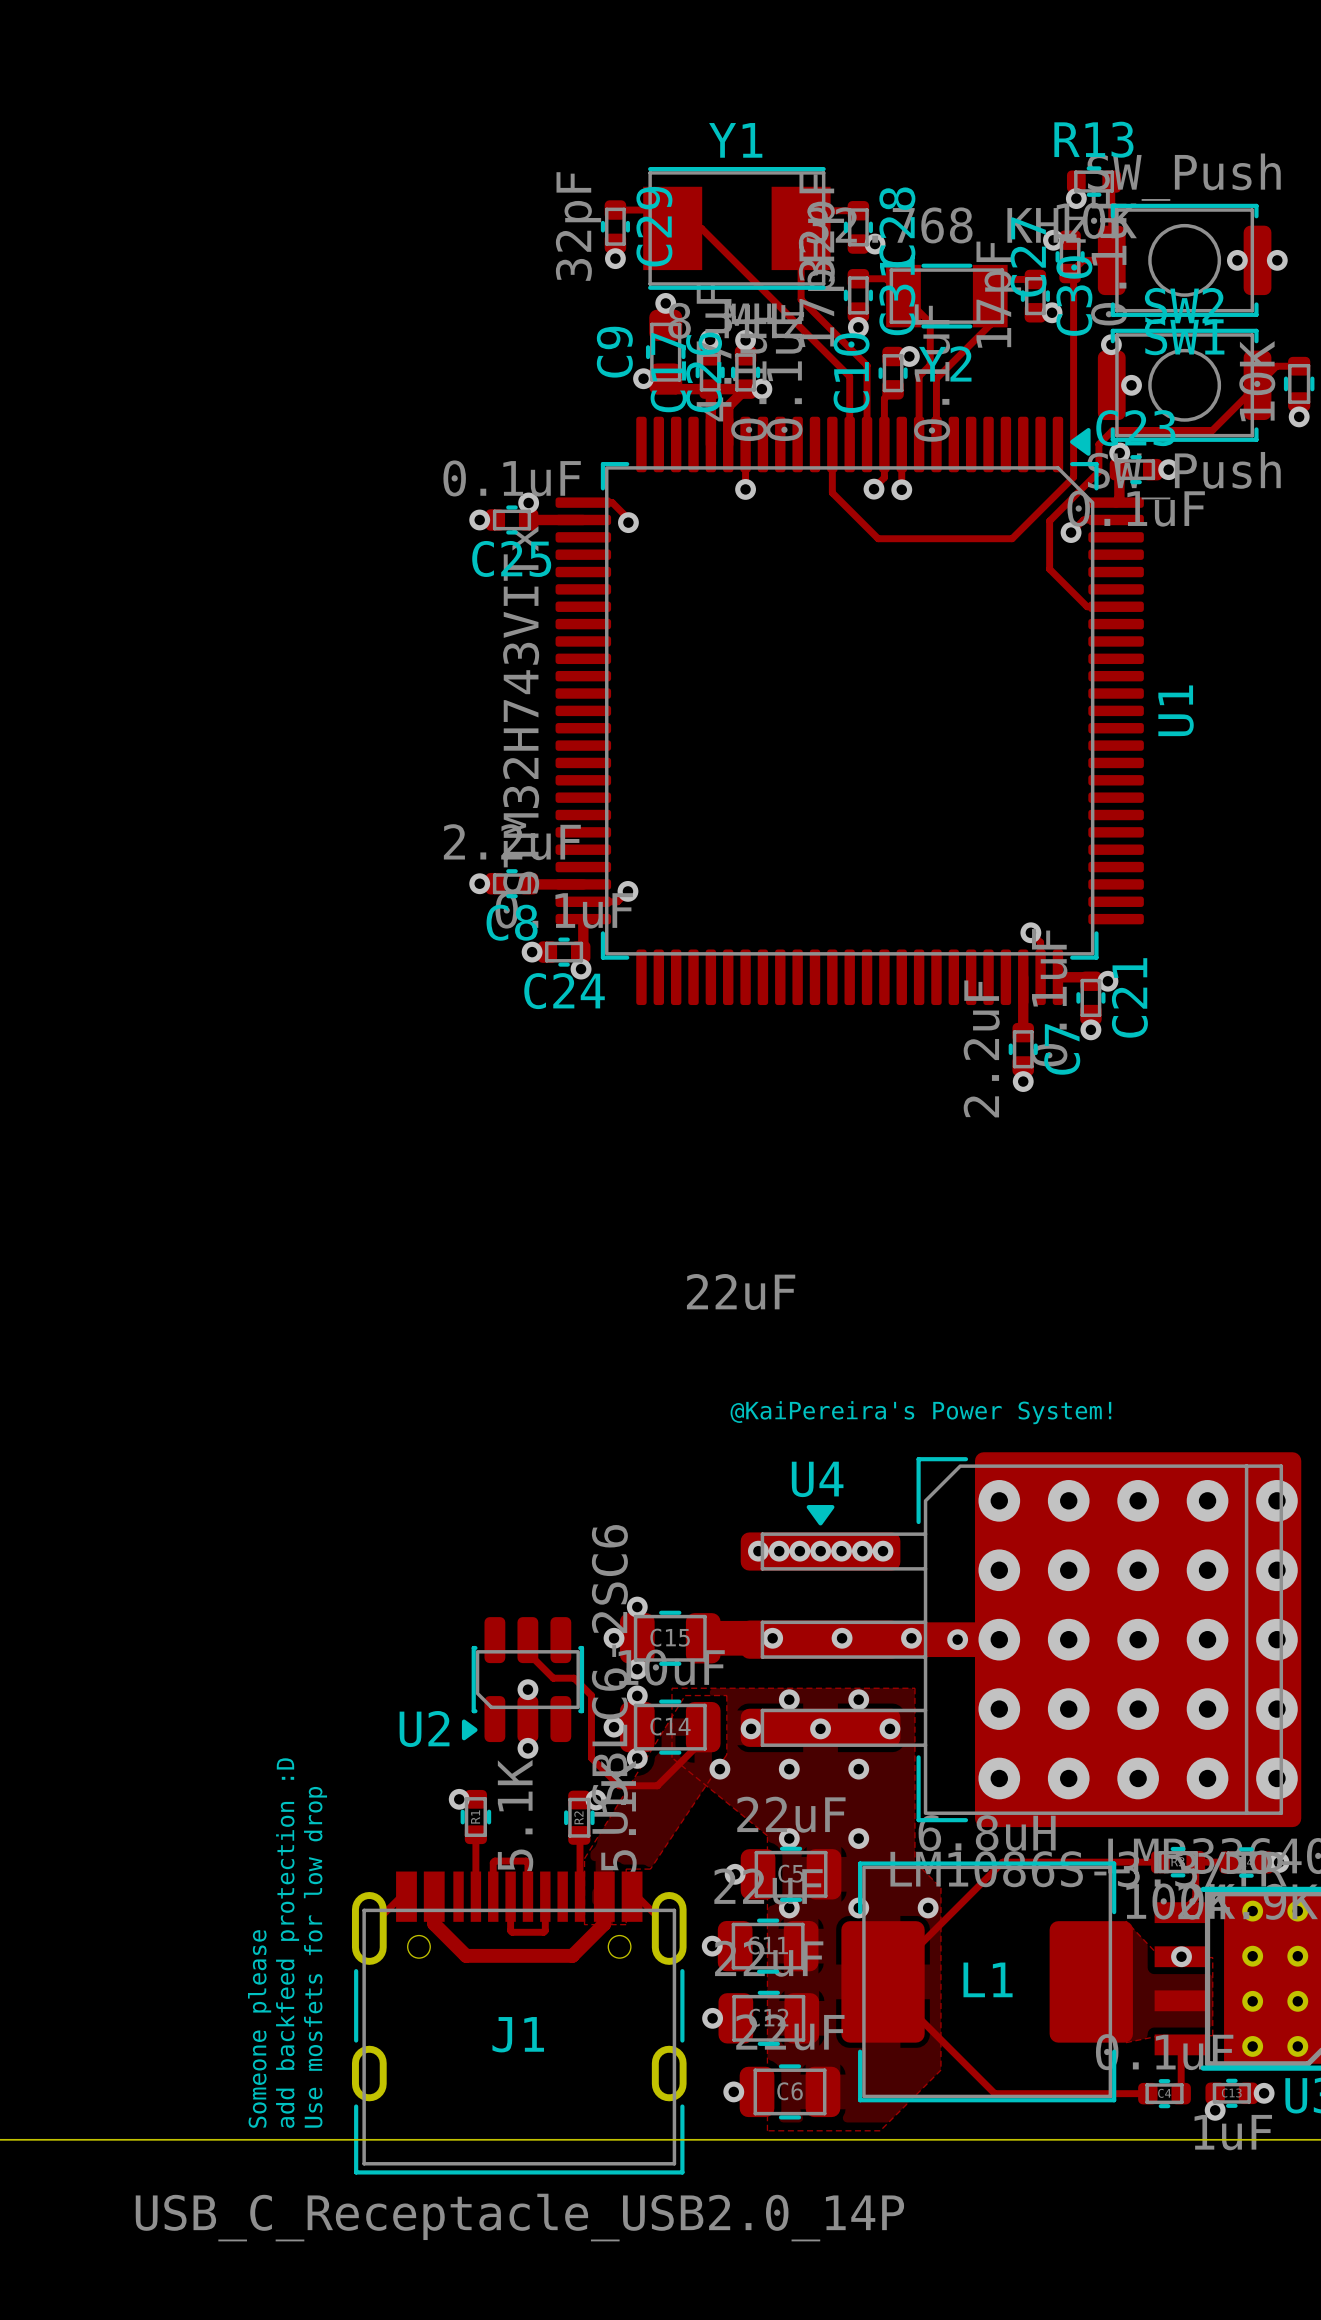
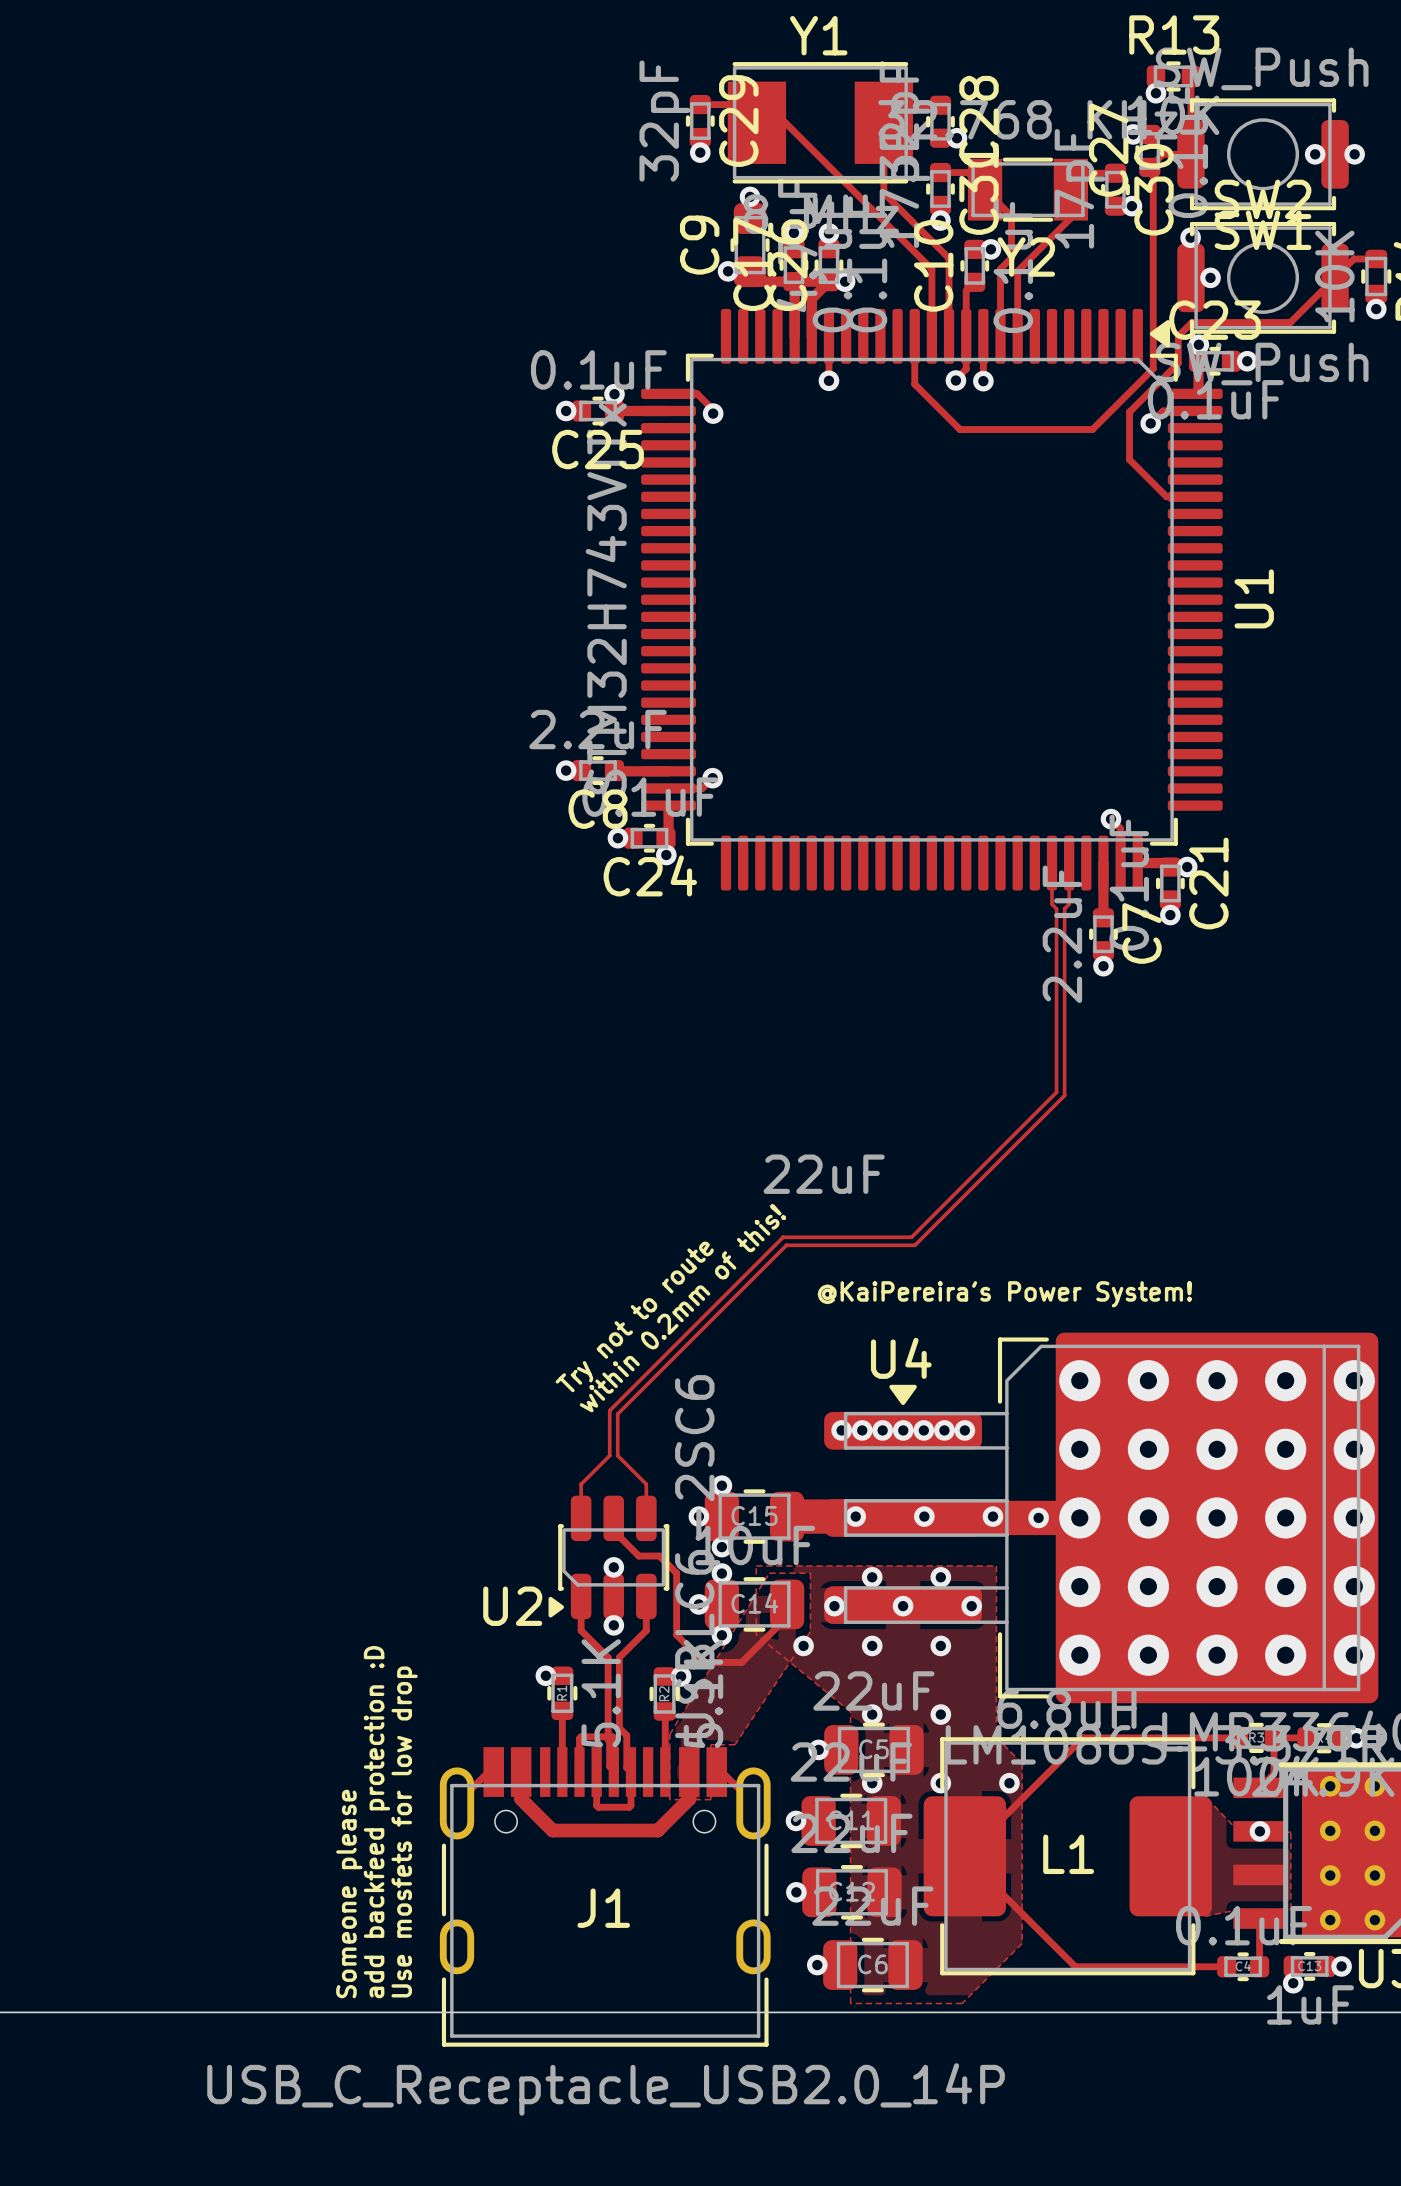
track: none -> (1052, 863) (1052, 904) (1056, 908) (1056, 1092) (911, 1237) (783, 1237) (609, 1410) (609, 1455) (581, 1484) (581, 1518)
track: none -> (1069, 863) (1069, 904) (1064, 908) (1064, 1095) (914, 1245) (786, 1245) (617, 1414) (617, 1455) (646, 1484) (646, 1518)
text: none -> within 0.2mm of this! (682, 1308)
text: none -> Try not to route (634, 1316)
track: none -> (581, 1596) (581, 1630) (608, 1657) (608, 1739) (609, 1739) (609, 1766) (613, 1770)
track: none -> (646, 1596) (646, 1630) (619, 1657) (619, 1728) (626, 1735) (626, 1767) (630, 1772)

